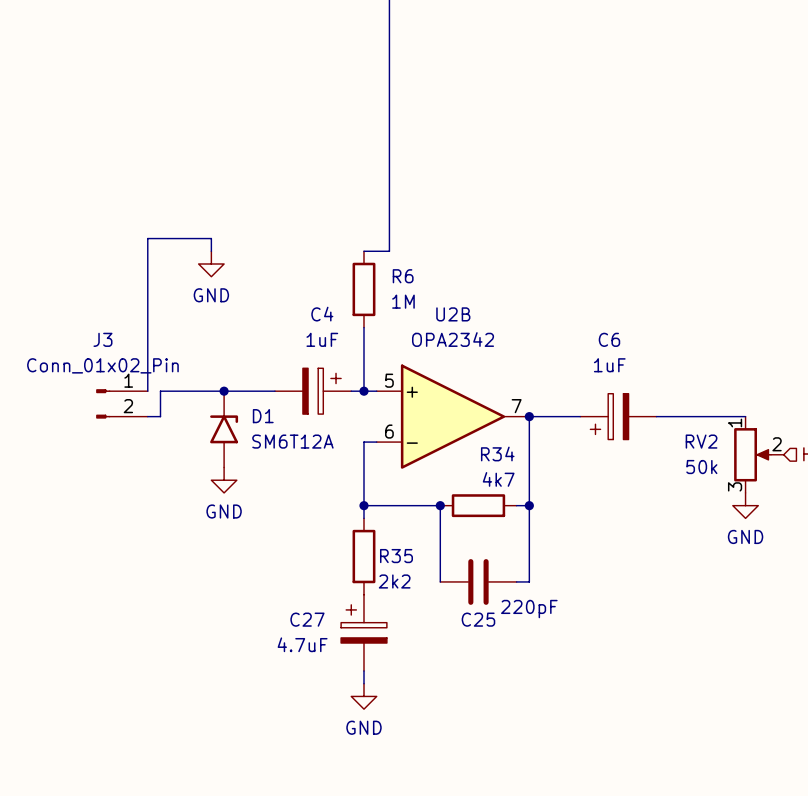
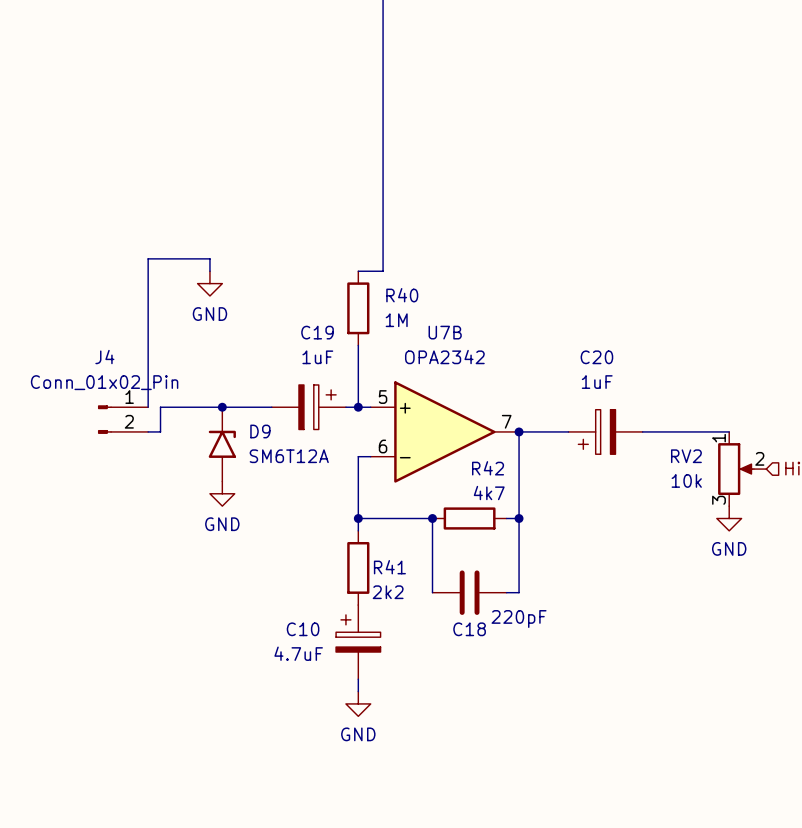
R6 name: R6 (403, 276) -> R40 (402, 295)
C4 name: C4 (322, 314) -> C19 (317, 332)
U2B name: U2B (453, 314) -> U7B (445, 332)
J3 name: J3 (102, 339) -> J4 (104, 357)
C6 name: C6 (609, 339) -> C20 (596, 357)
D1 name: D1 (263, 416) -> D9 (260, 431)
R34 name: R34 (497, 454) -> R42 (488, 468)
RV2 value: 50k (701, 467) -> 10k (686, 480)
R35 name: R35 (396, 556) -> R41 (389, 567)
C27 name: C27 (307, 619) -> C10 (303, 629)
C25 name: C25 (478, 619) -> C18 (469, 629)

